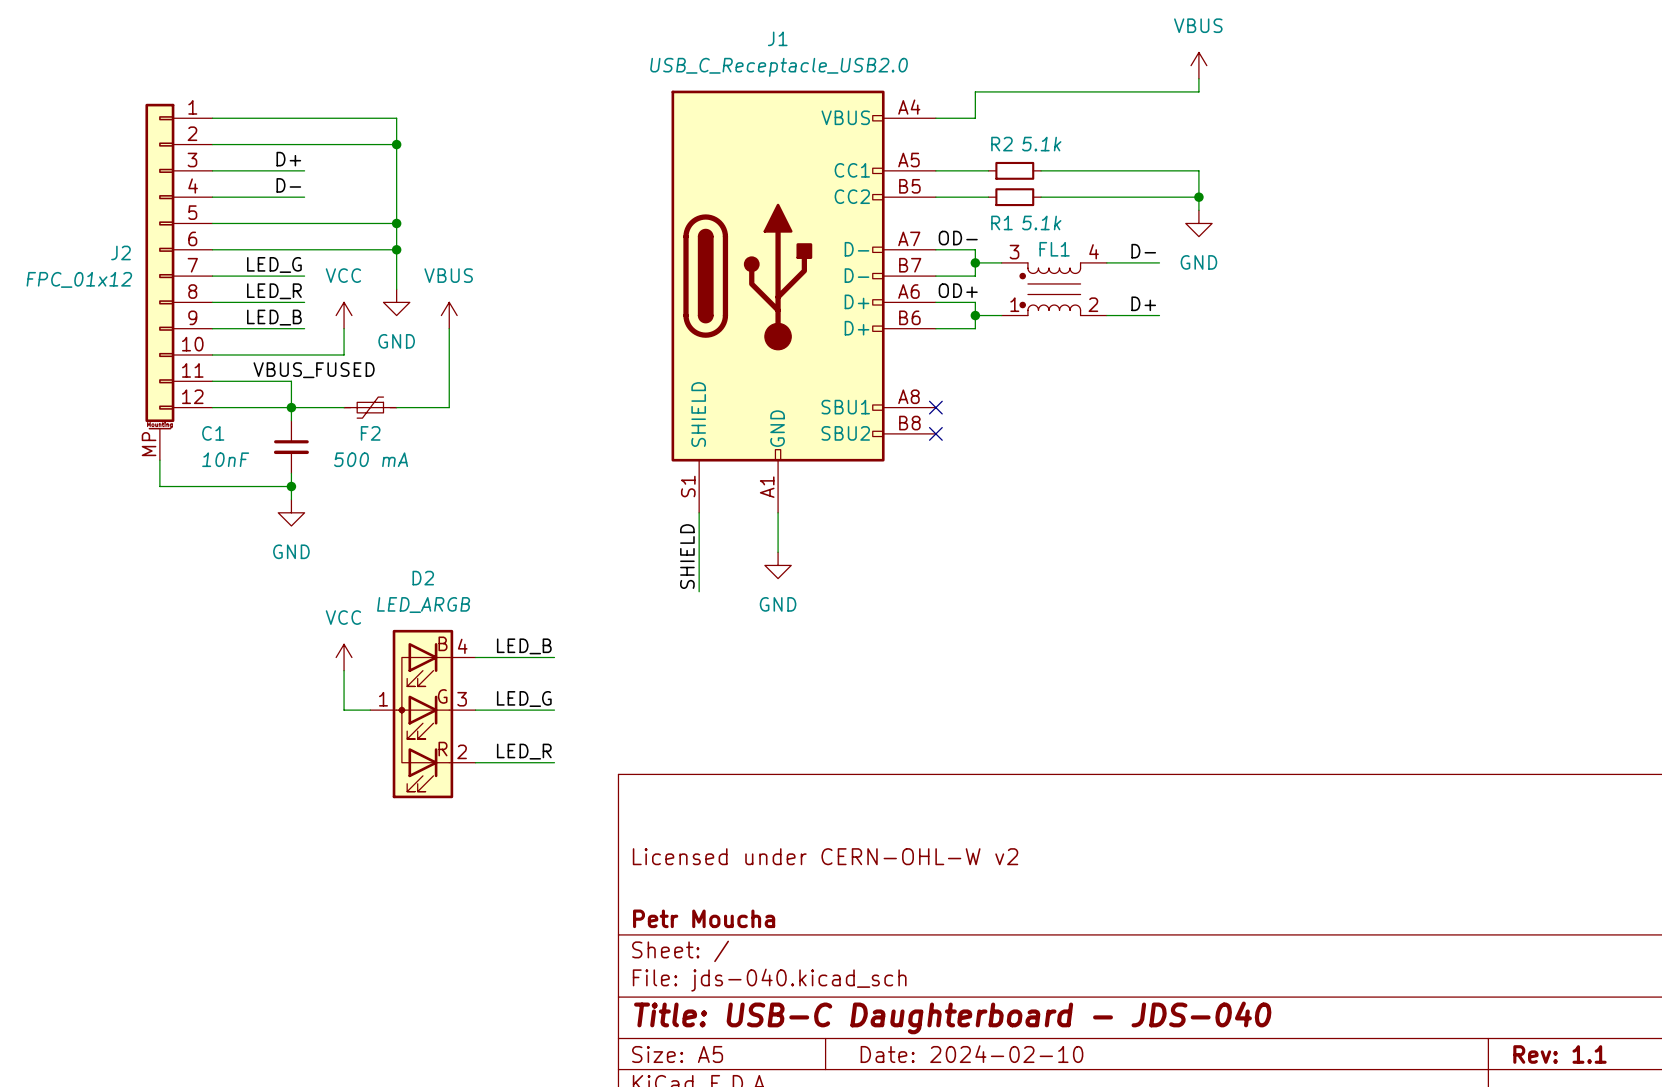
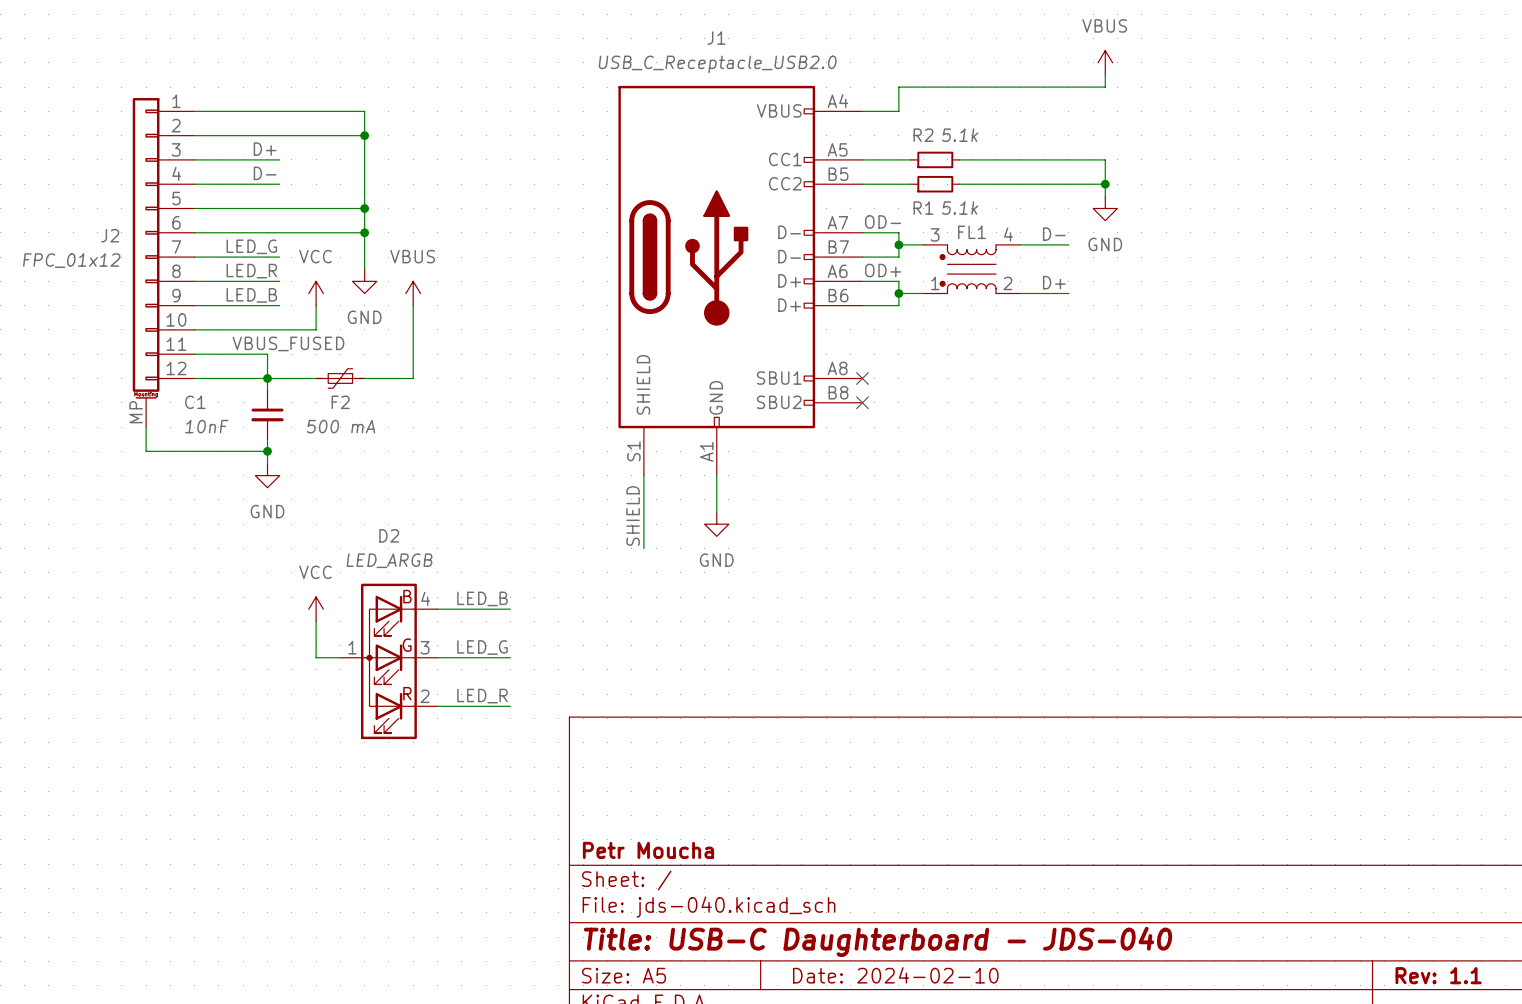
title block: Licensed under CERN-OHL-W v2 (825, 856) -> none

